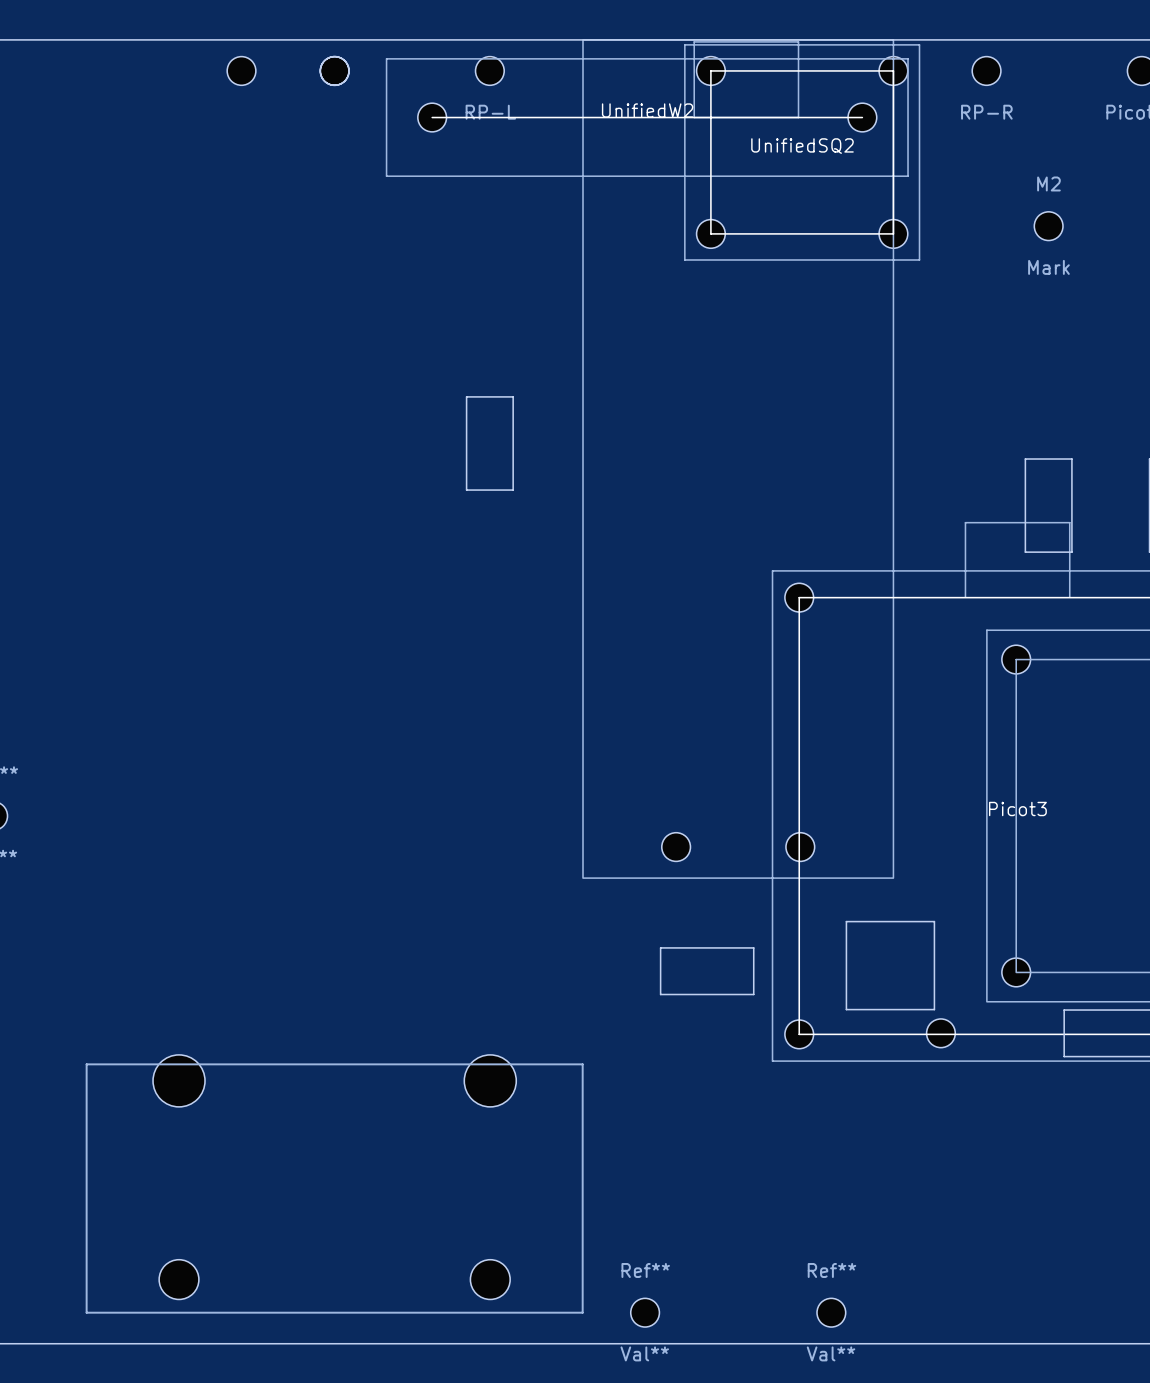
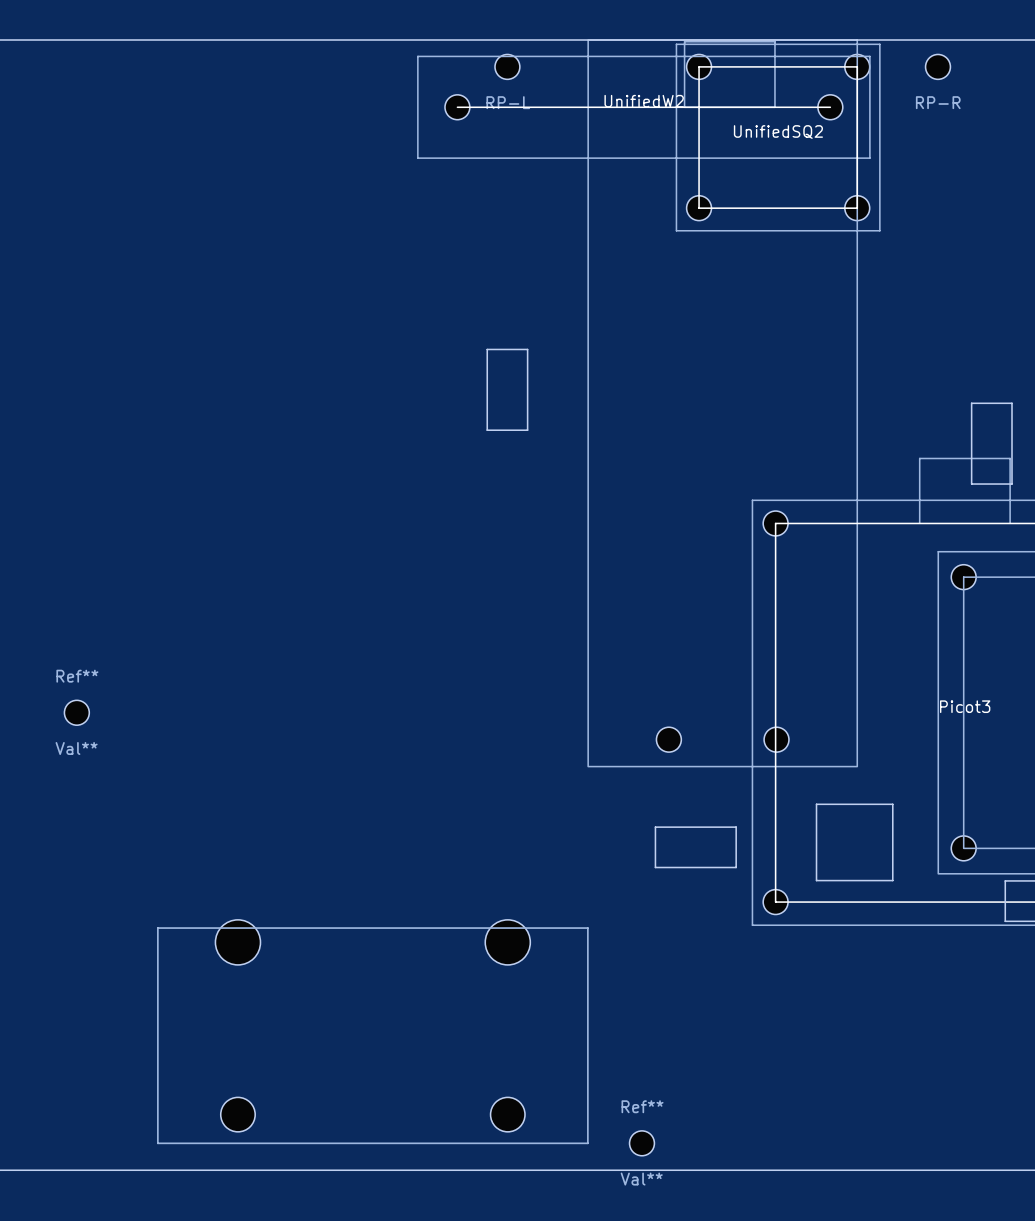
part: (241, 70) -> none
part: (334, 70) -> none
M2: Mark (1048, 226) -> none
part: (940, 1033) -> none
Ref**: Val** (831, 1312) -> none

